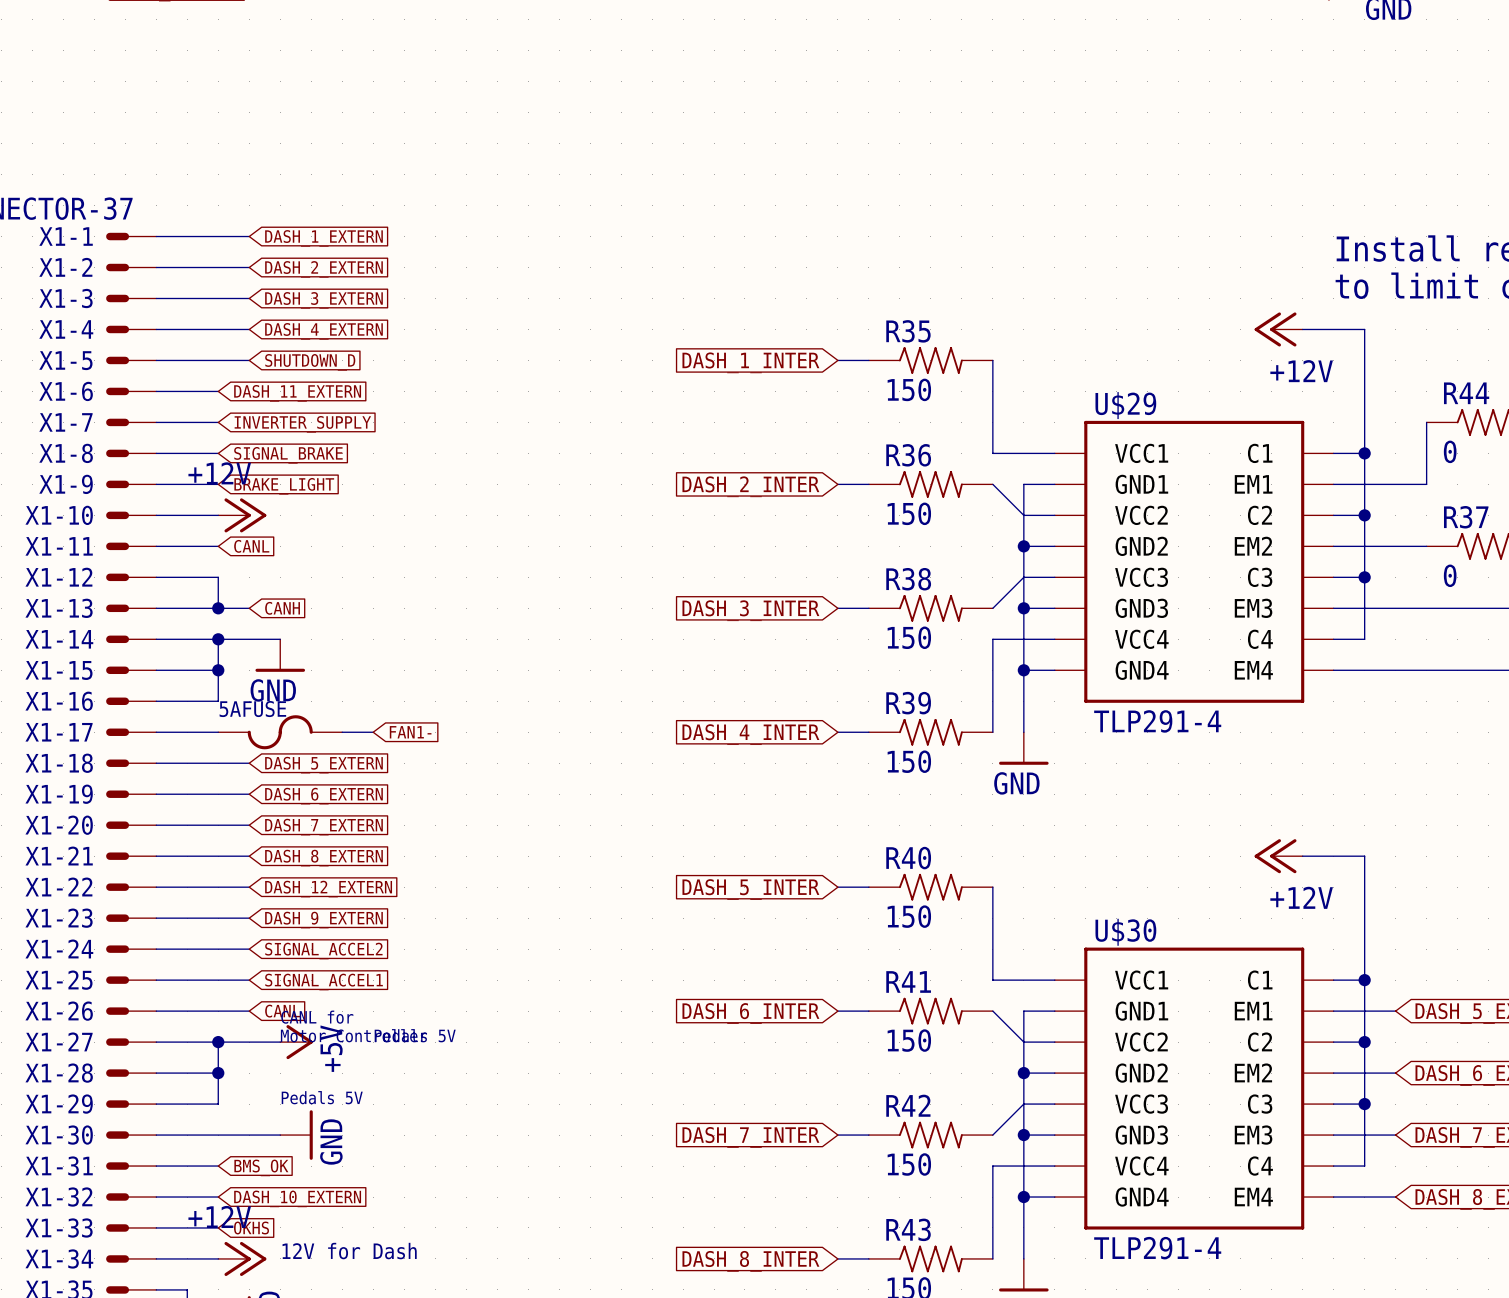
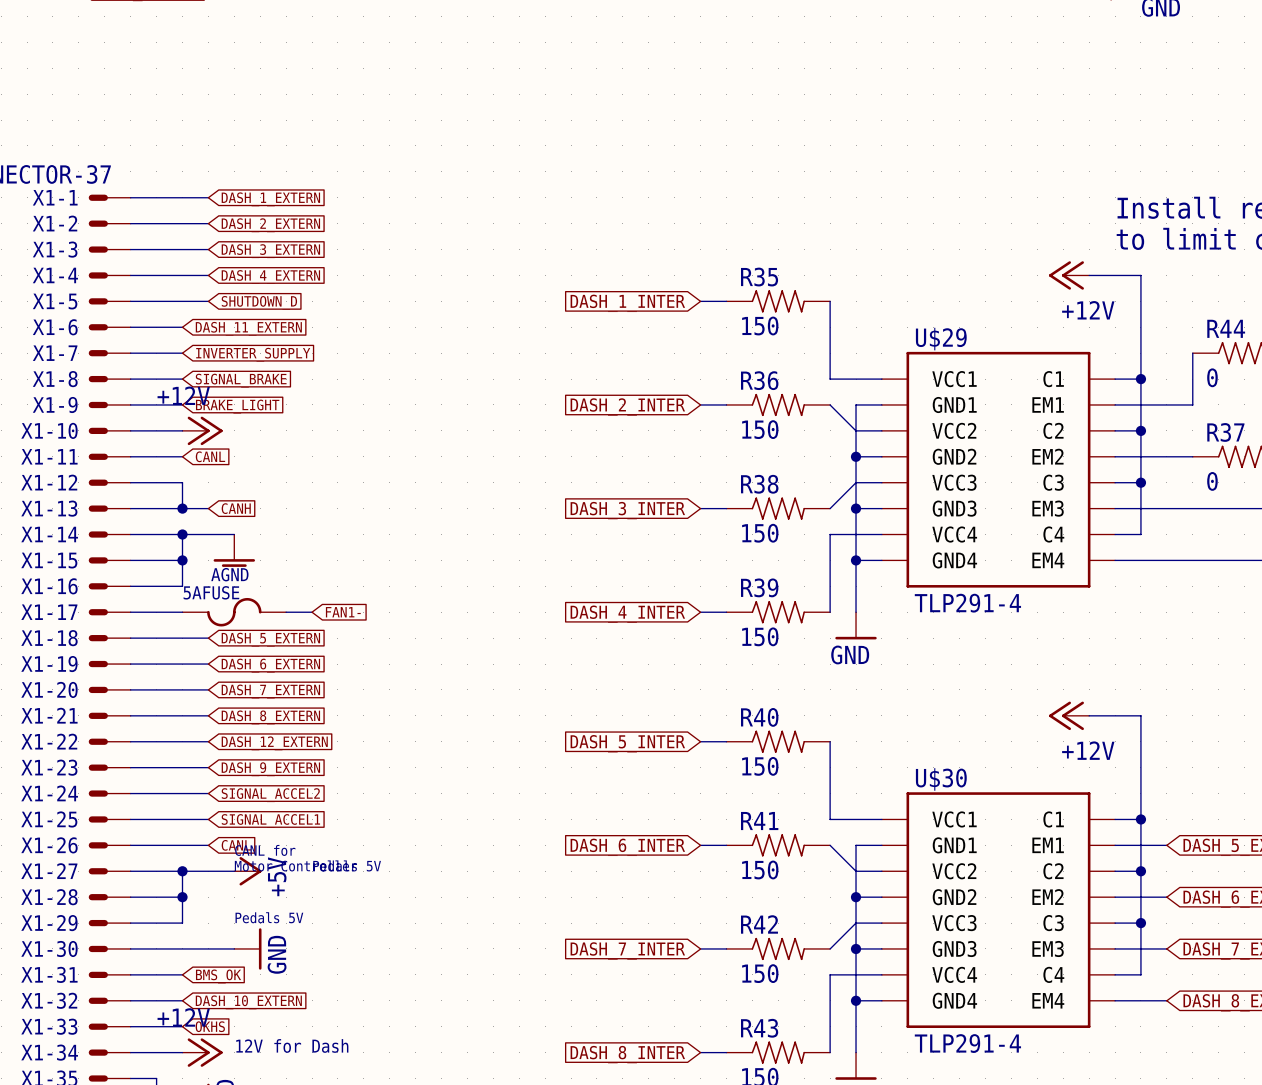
power symbol: GND (280, 655) -> AGND (234, 550)

